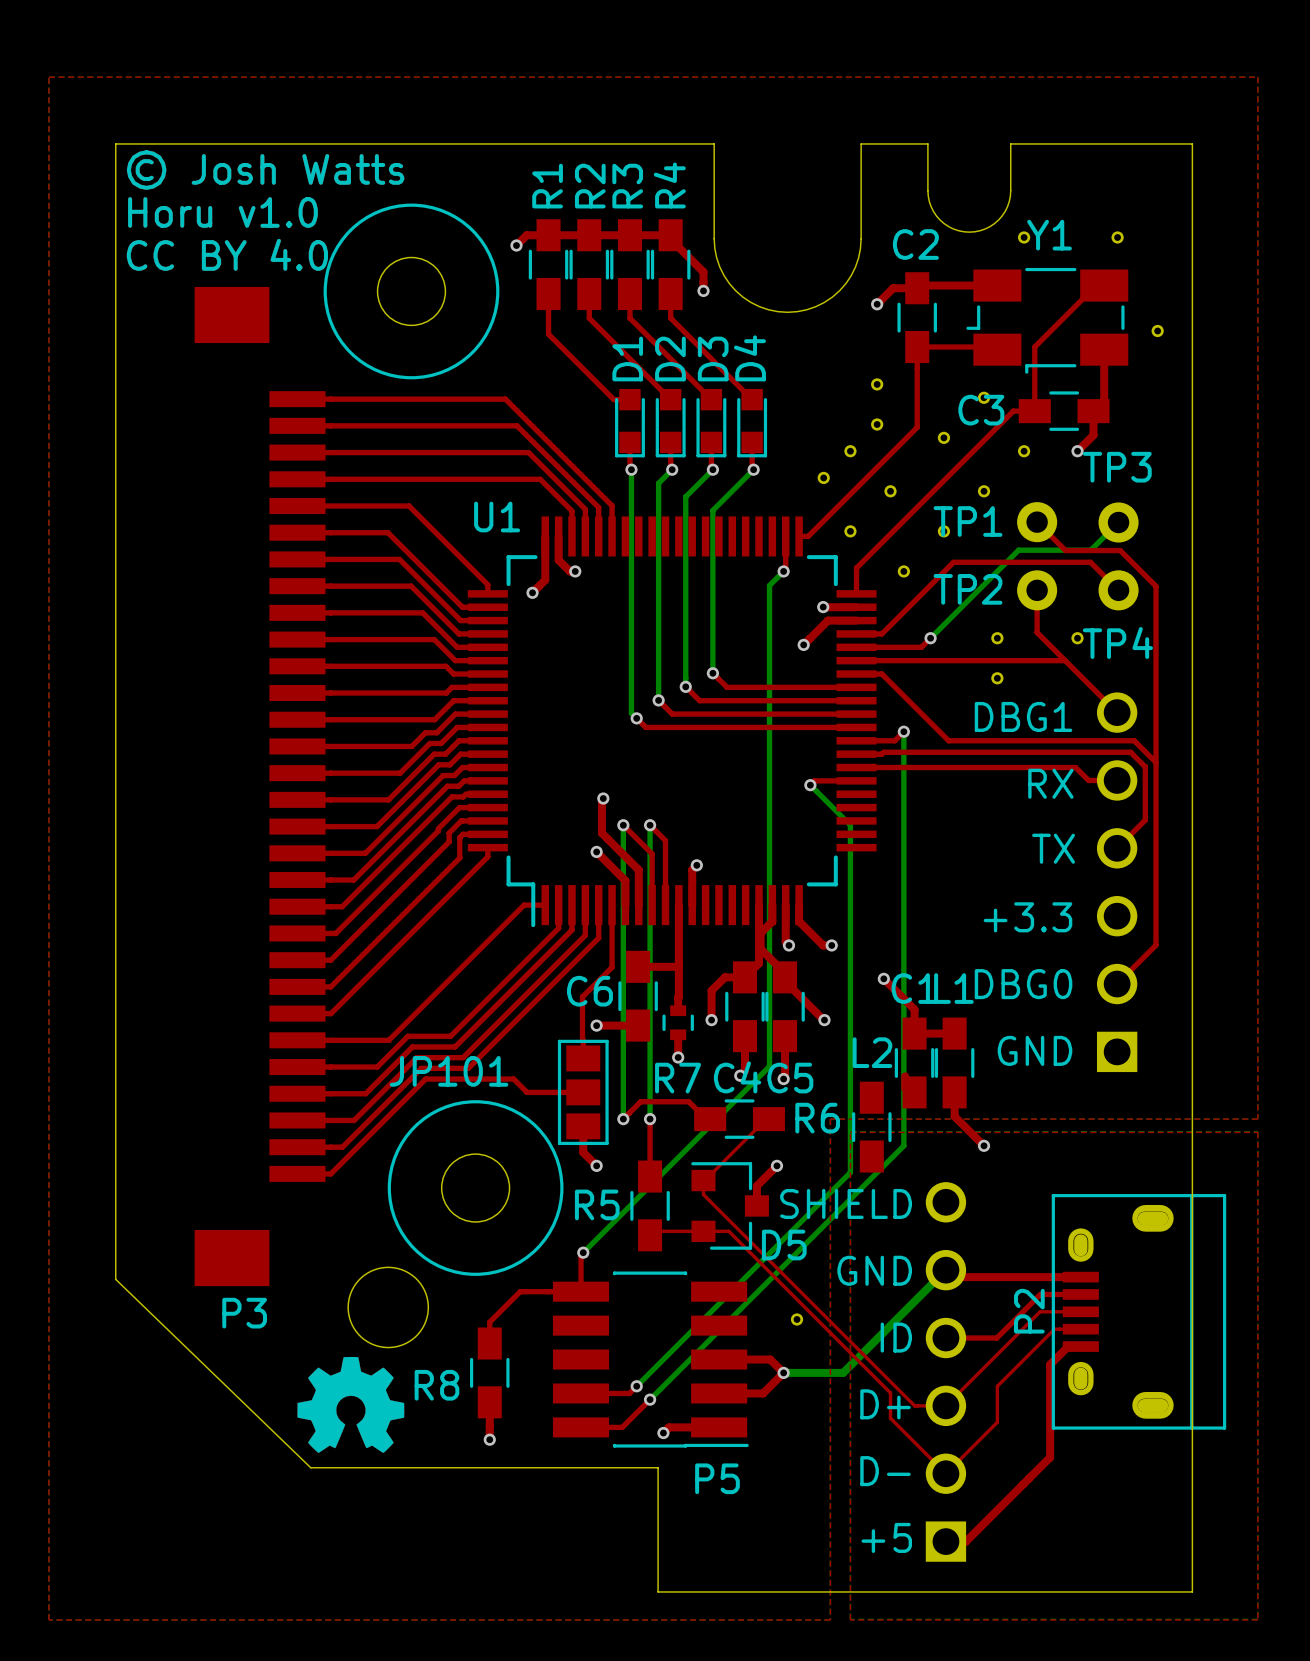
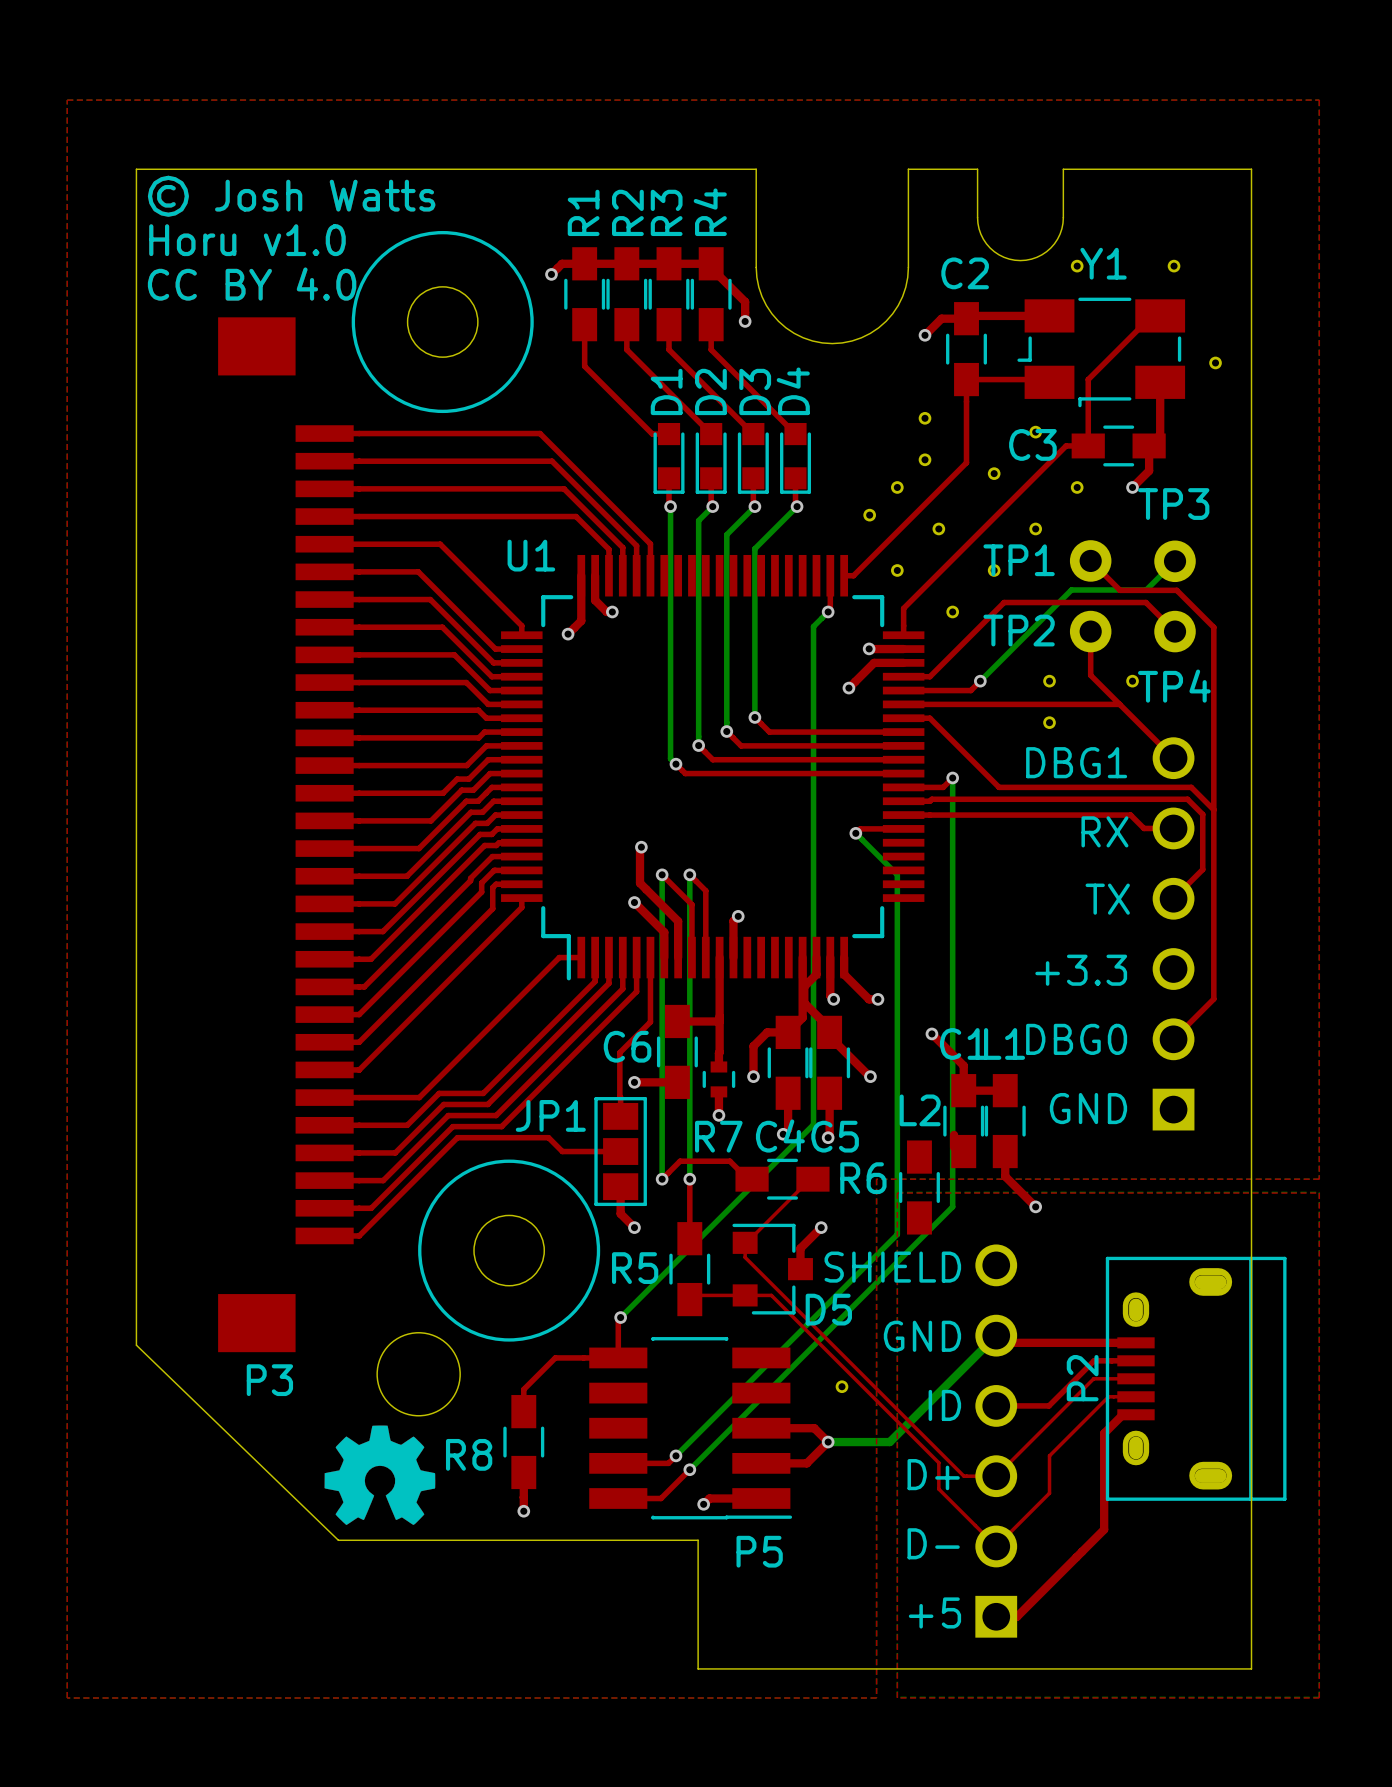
JP101 name: JP101 (449, 1071) -> JP1 (550, 1115)

